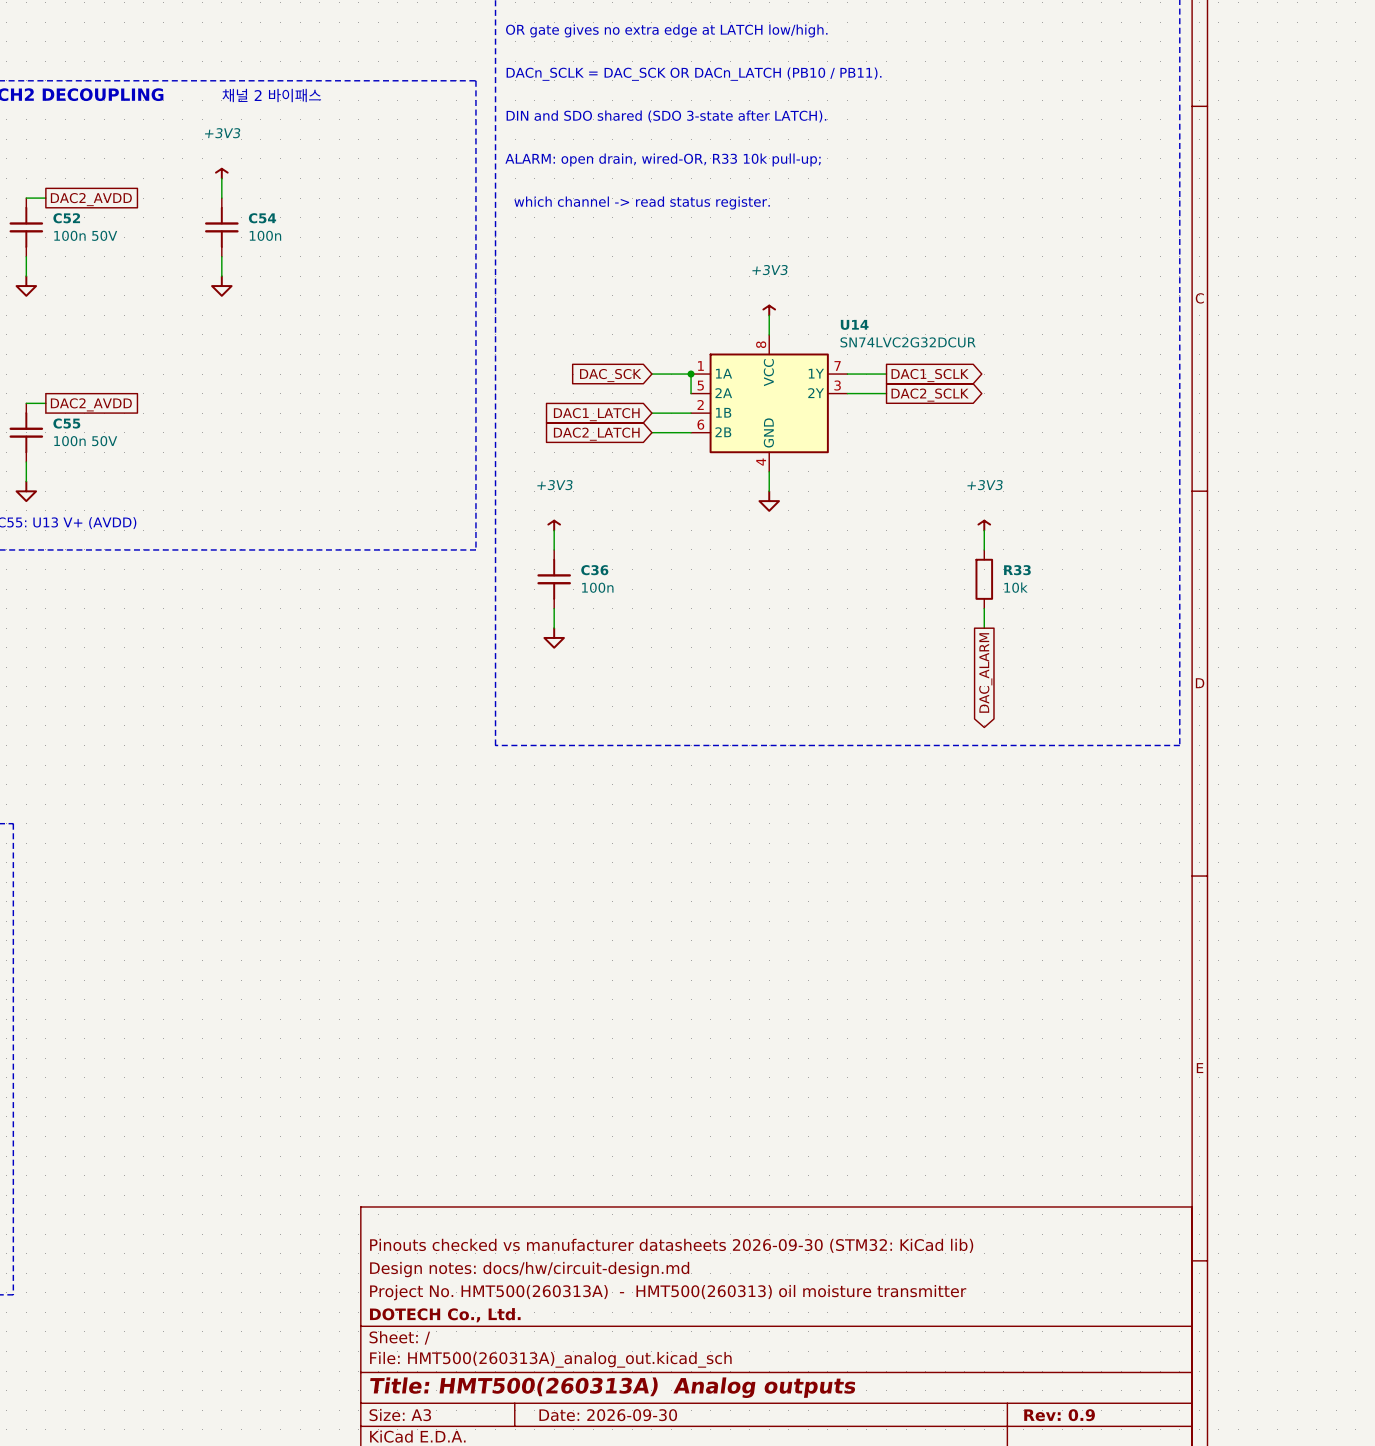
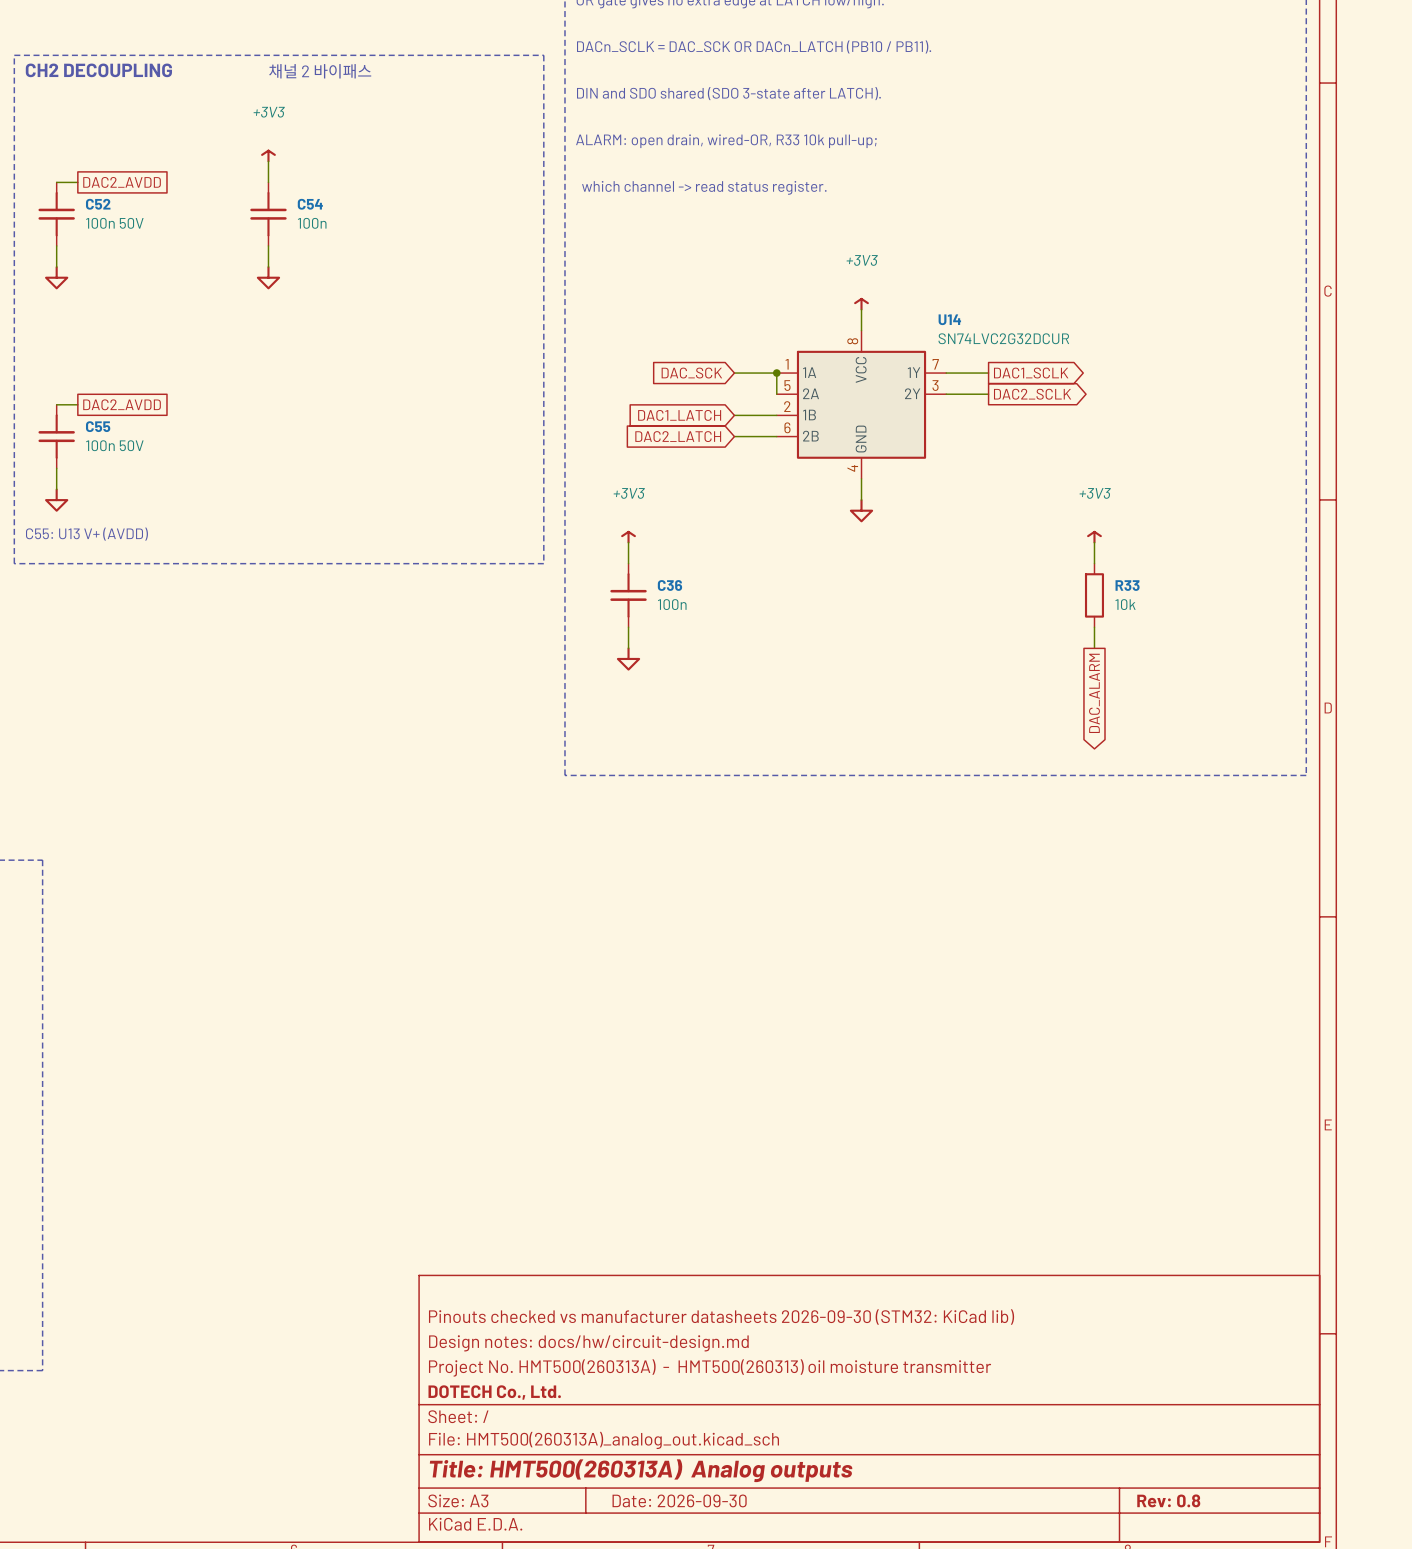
title block: Rev: 0.9 (1059, 1415) -> Rev: 0.8 (1168, 1500)

